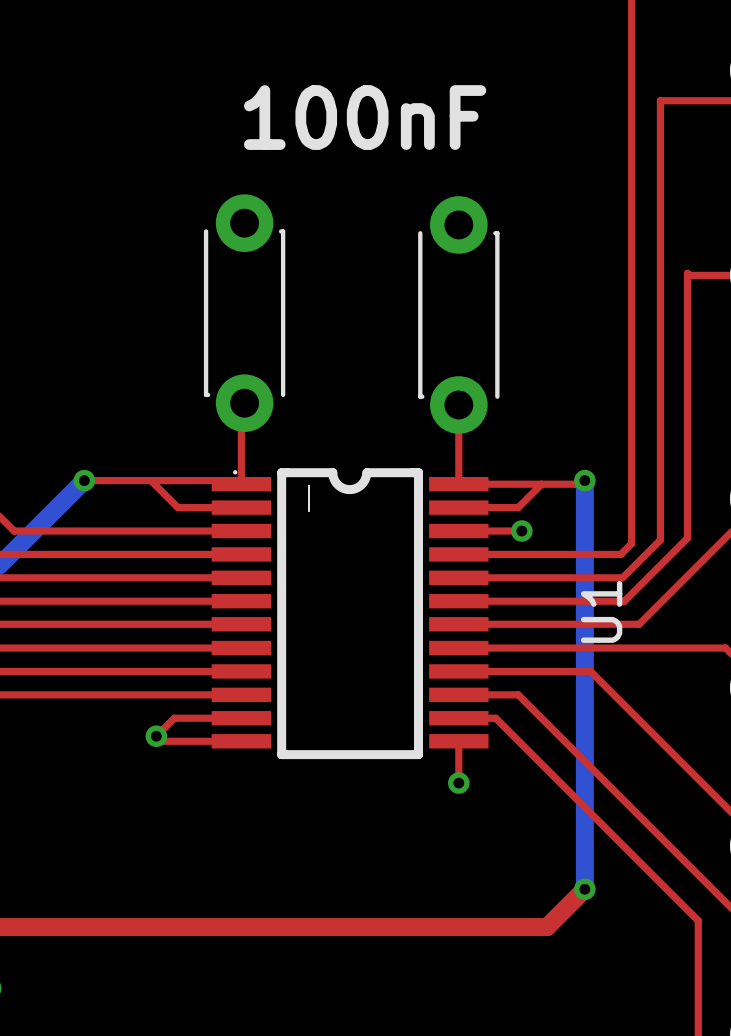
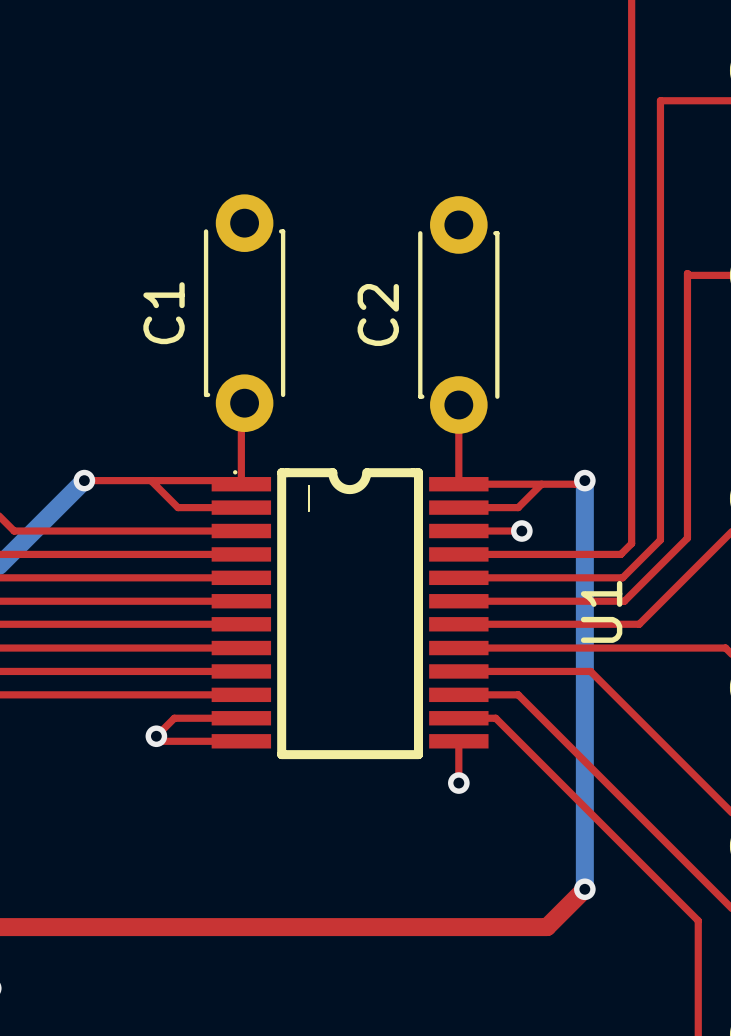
text: 100nF (365, 117) -> none
C1 name: none -> C1 (164, 313)
C2 name: none -> C2 (378, 314)

